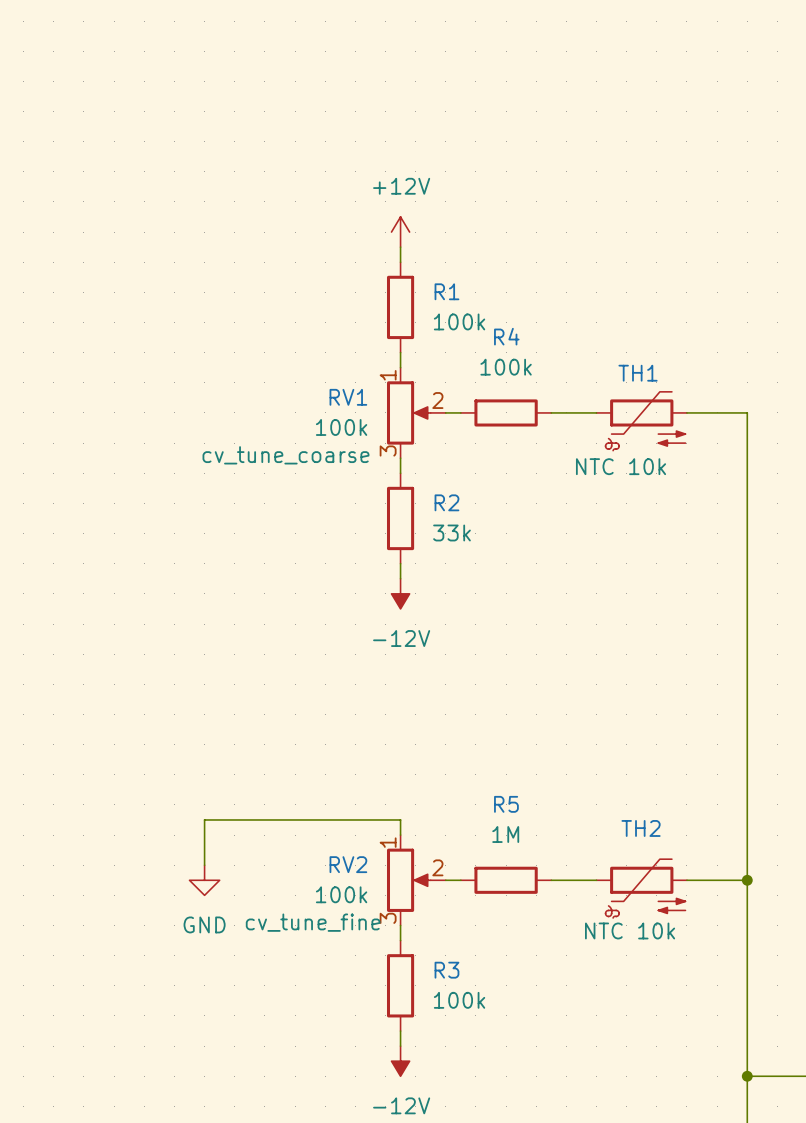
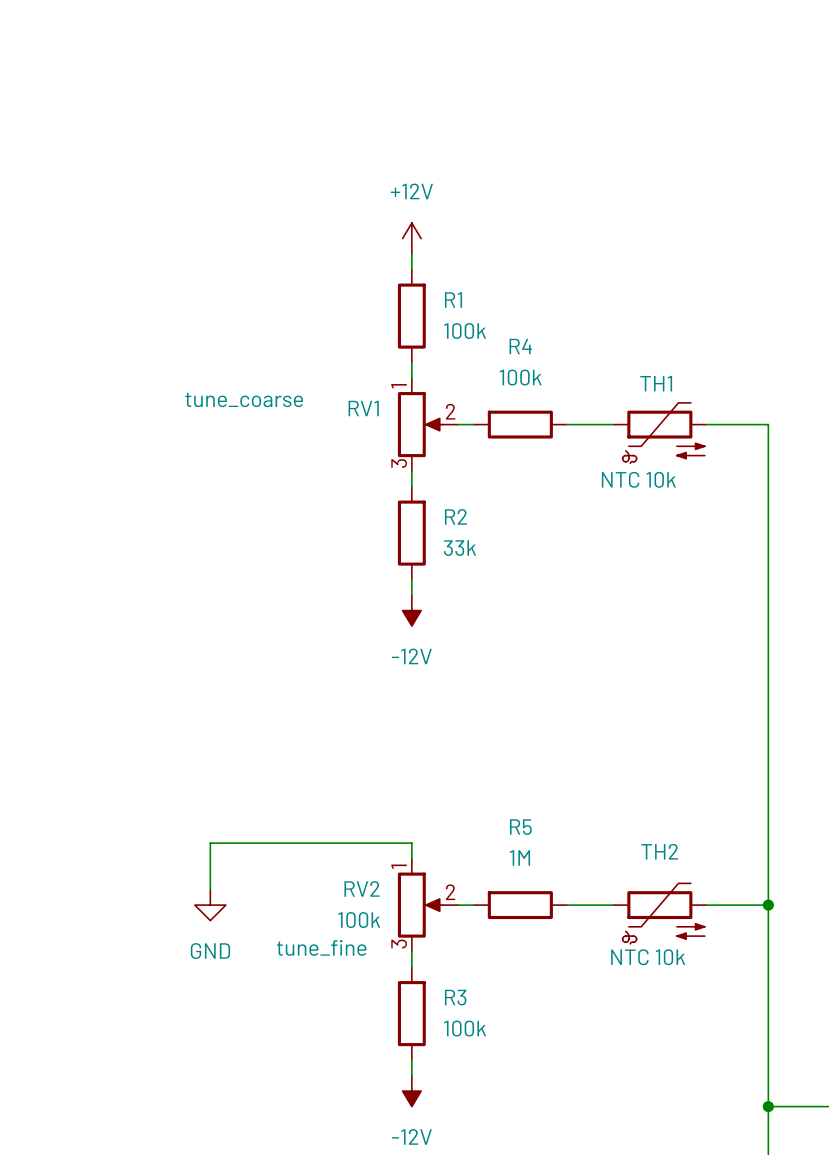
RV1 value: 100k (341, 427) -> none
RV1 text: cv_tune_coarse (285, 455) -> tune_coarse (244, 400)
RV2 text: cv_tune_fine (313, 922) -> tune_fine (321, 947)

